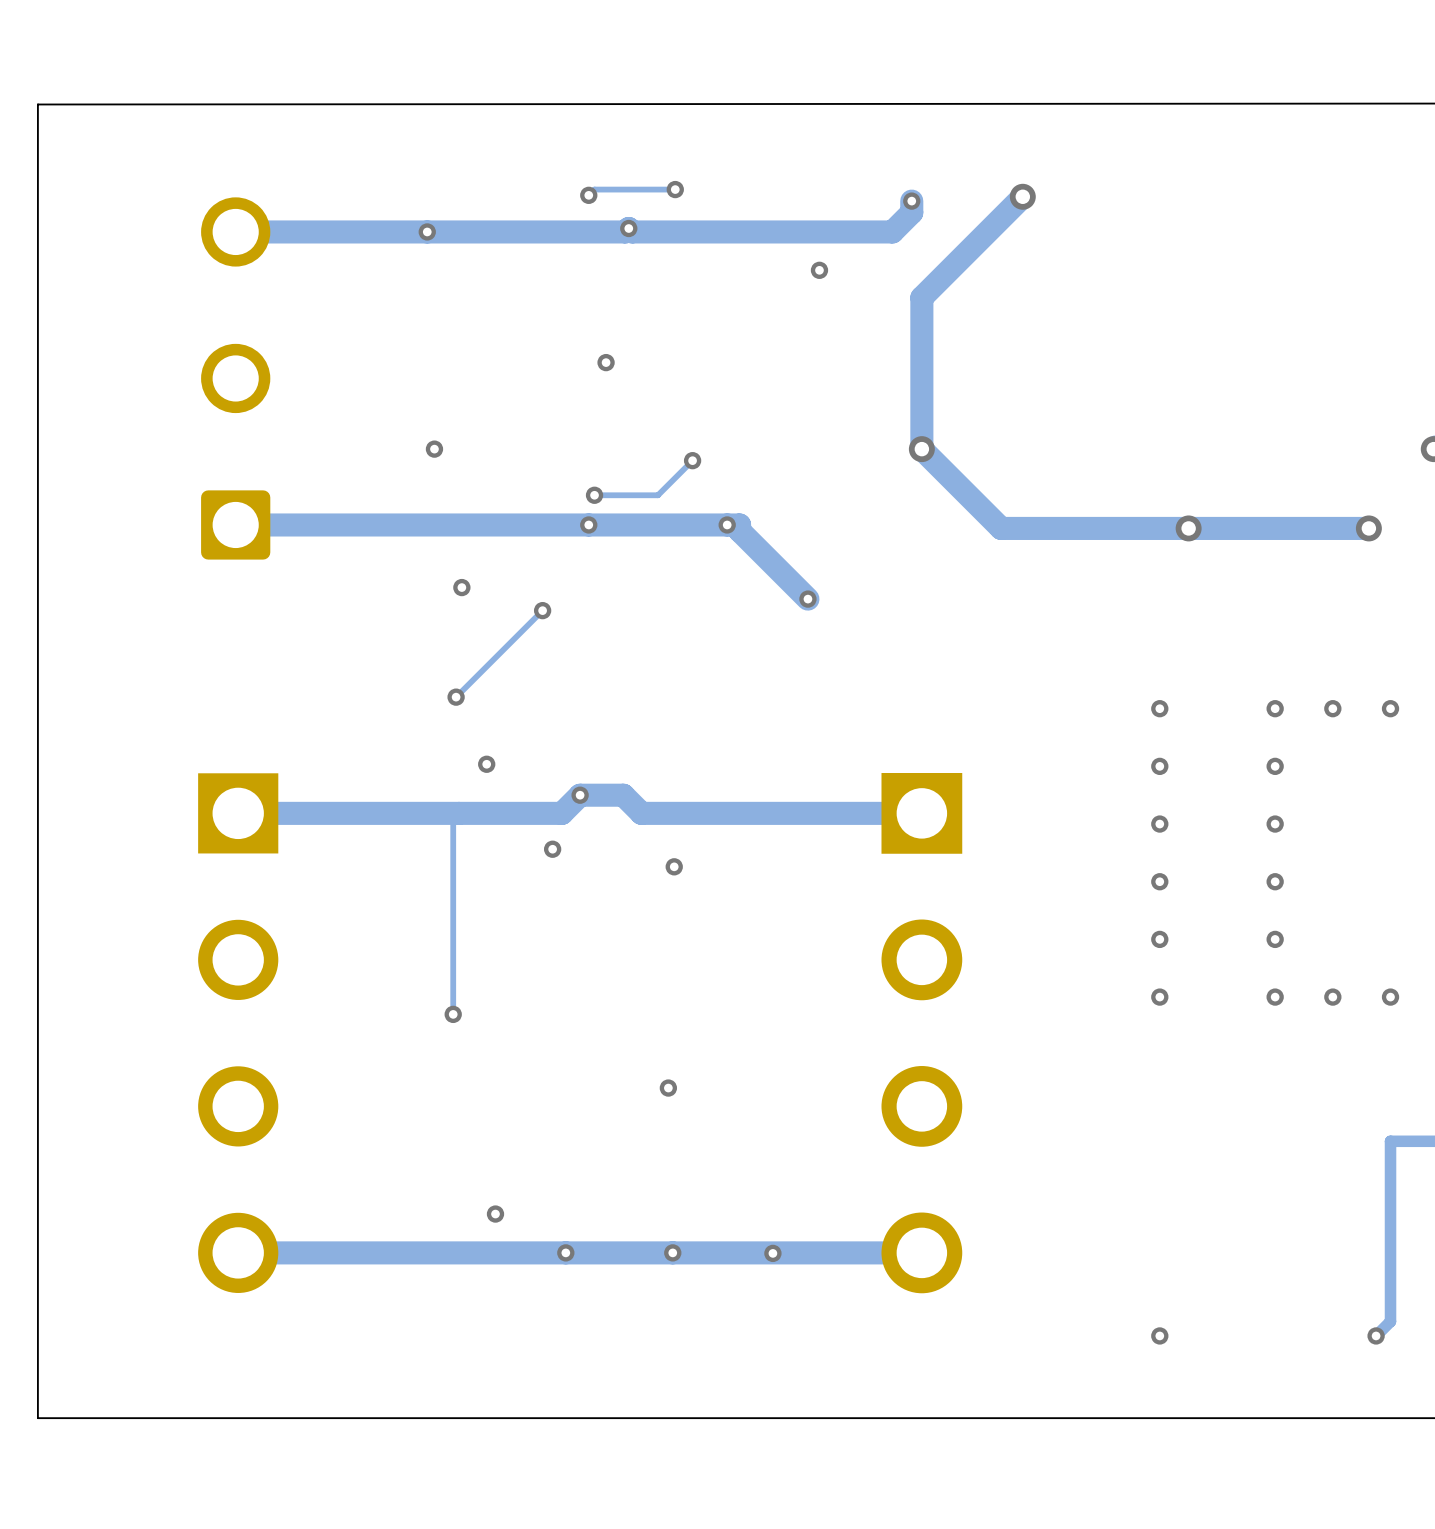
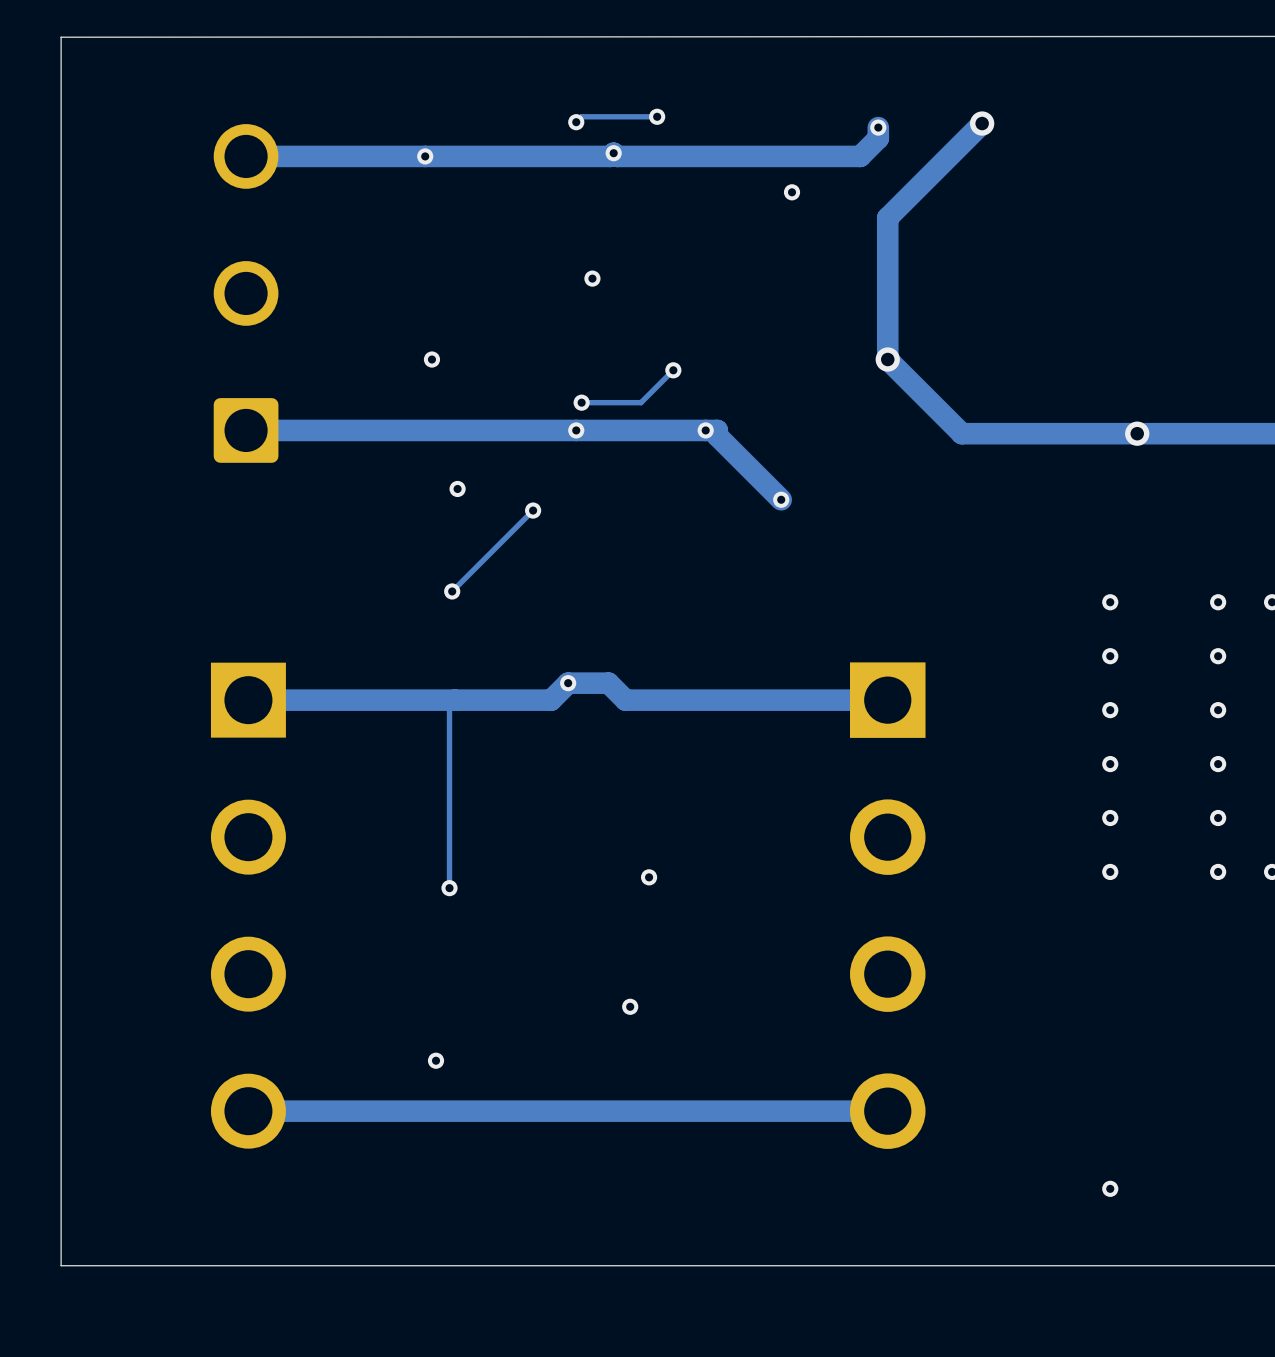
via: (486, 764) -> none
via: (552, 849) -> none
via: (674, 866) -> none
via: none -> (649, 877)
via: (668, 1088) -> none
via: none -> (630, 1006)
via position: (495, 1214) -> (436, 1060)
via: (565, 1252) -> none
via: (672, 1252) -> none
via: (772, 1253) -> none

